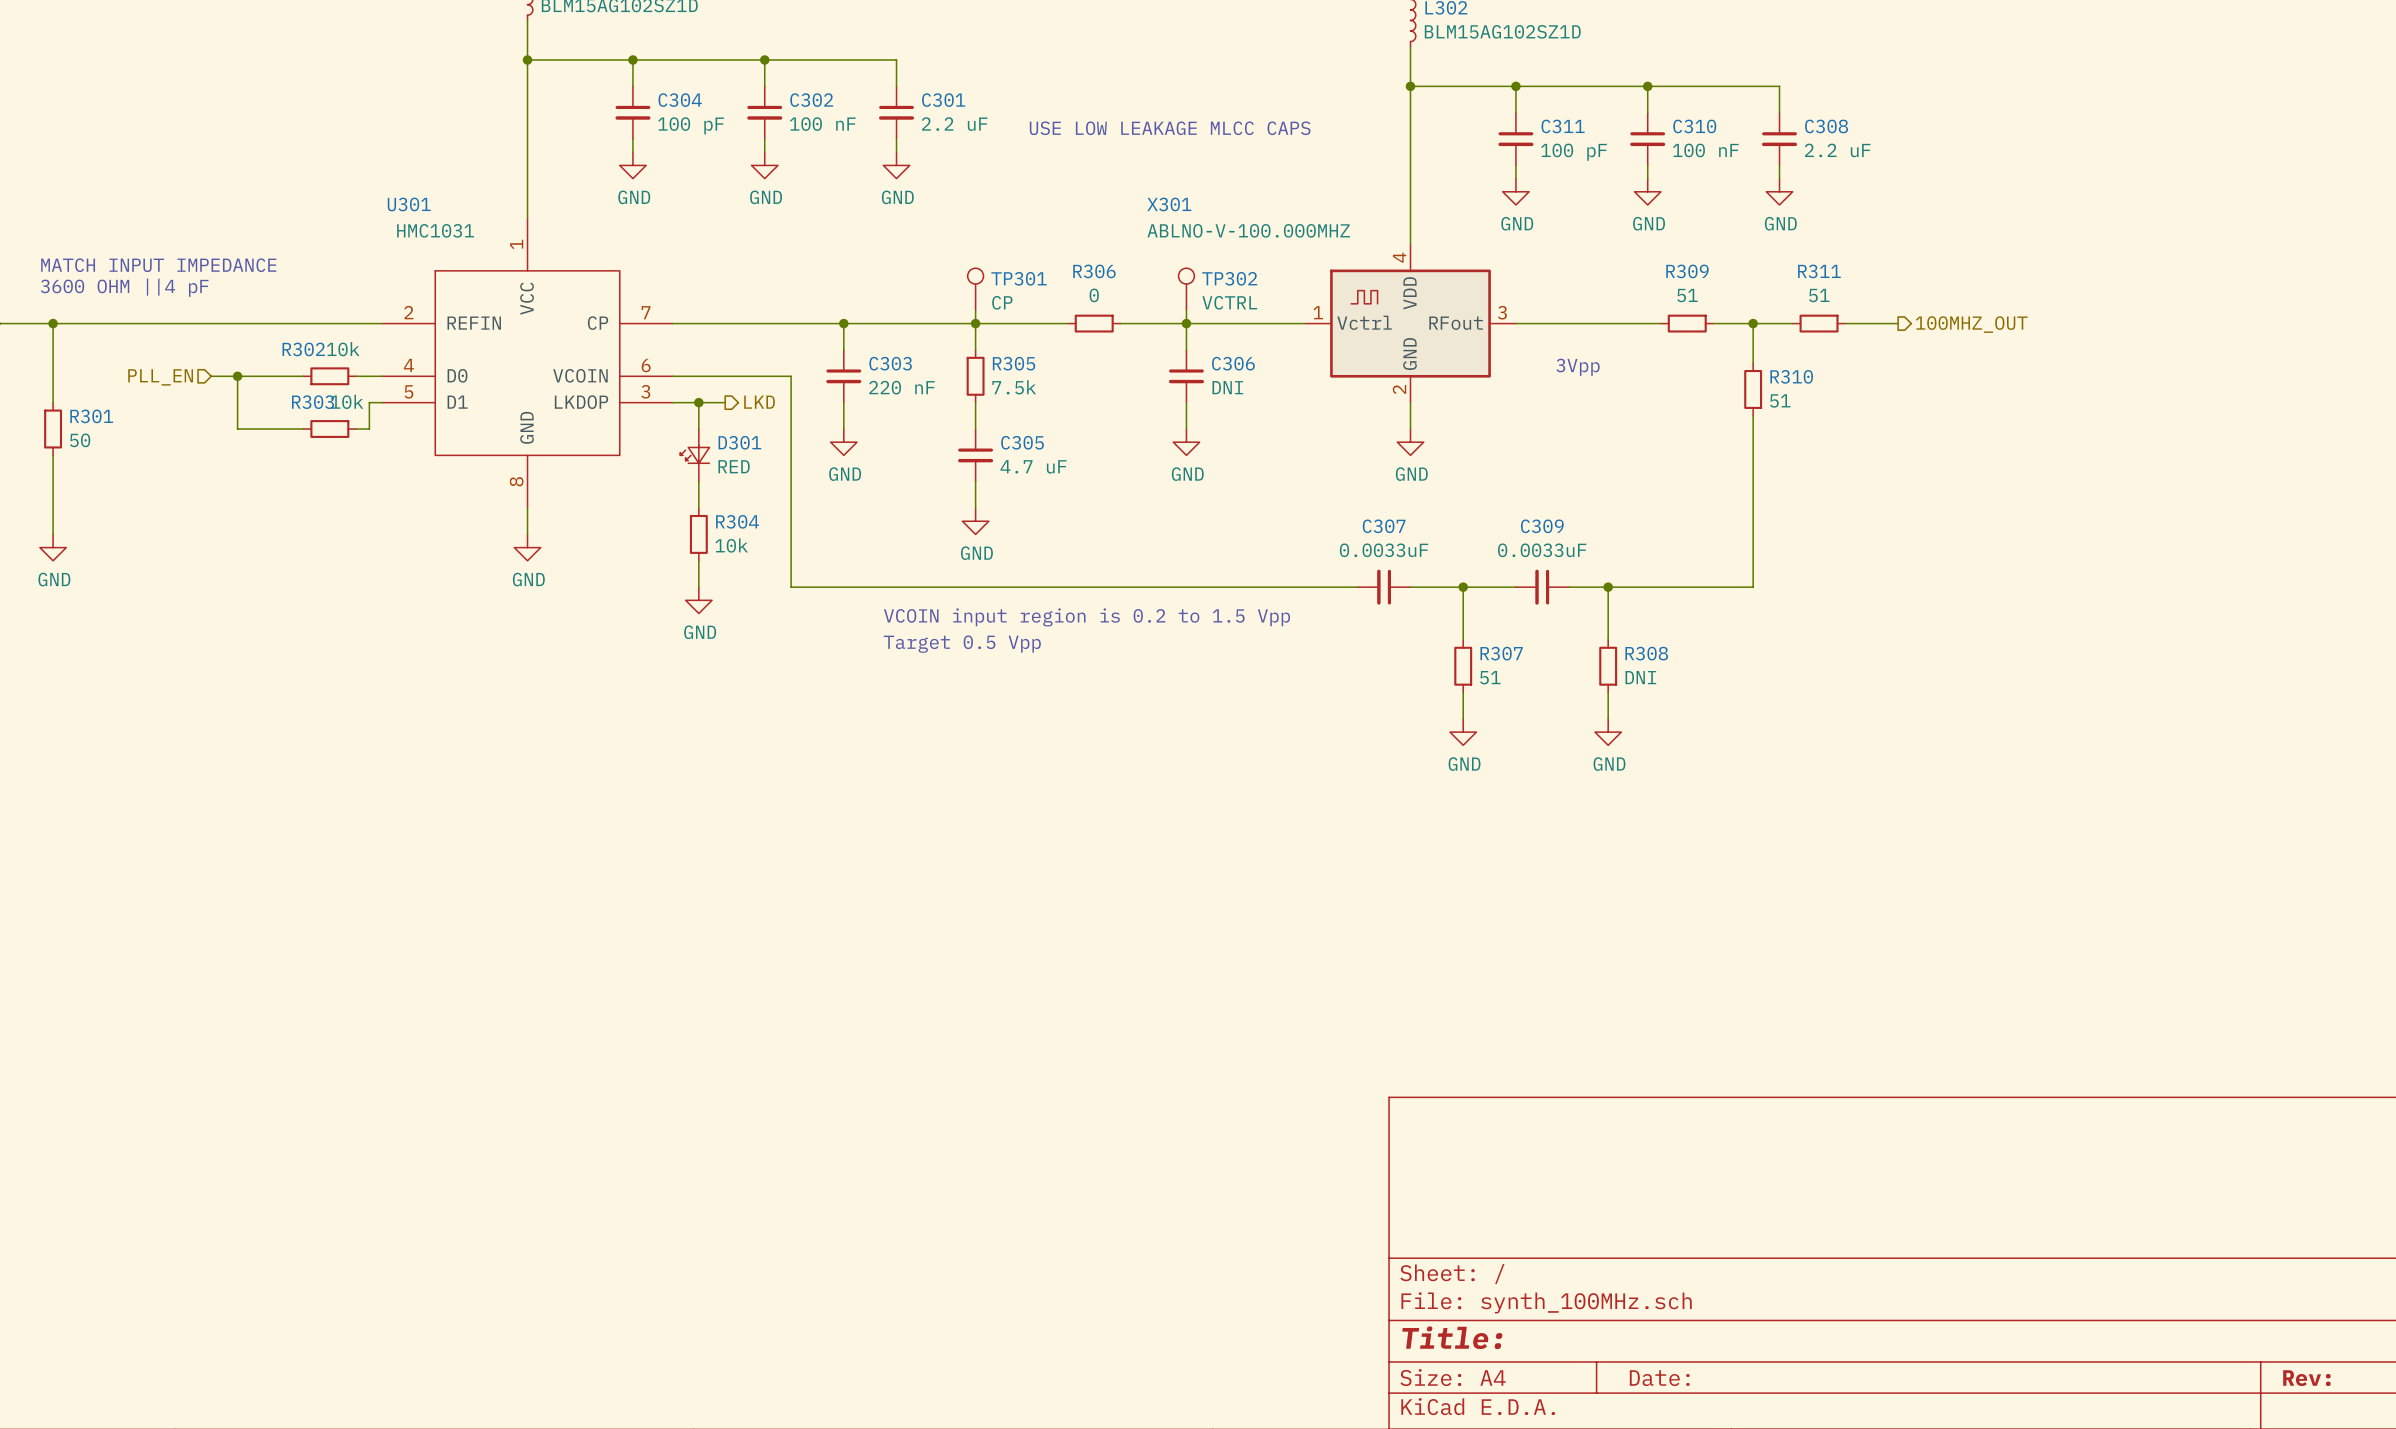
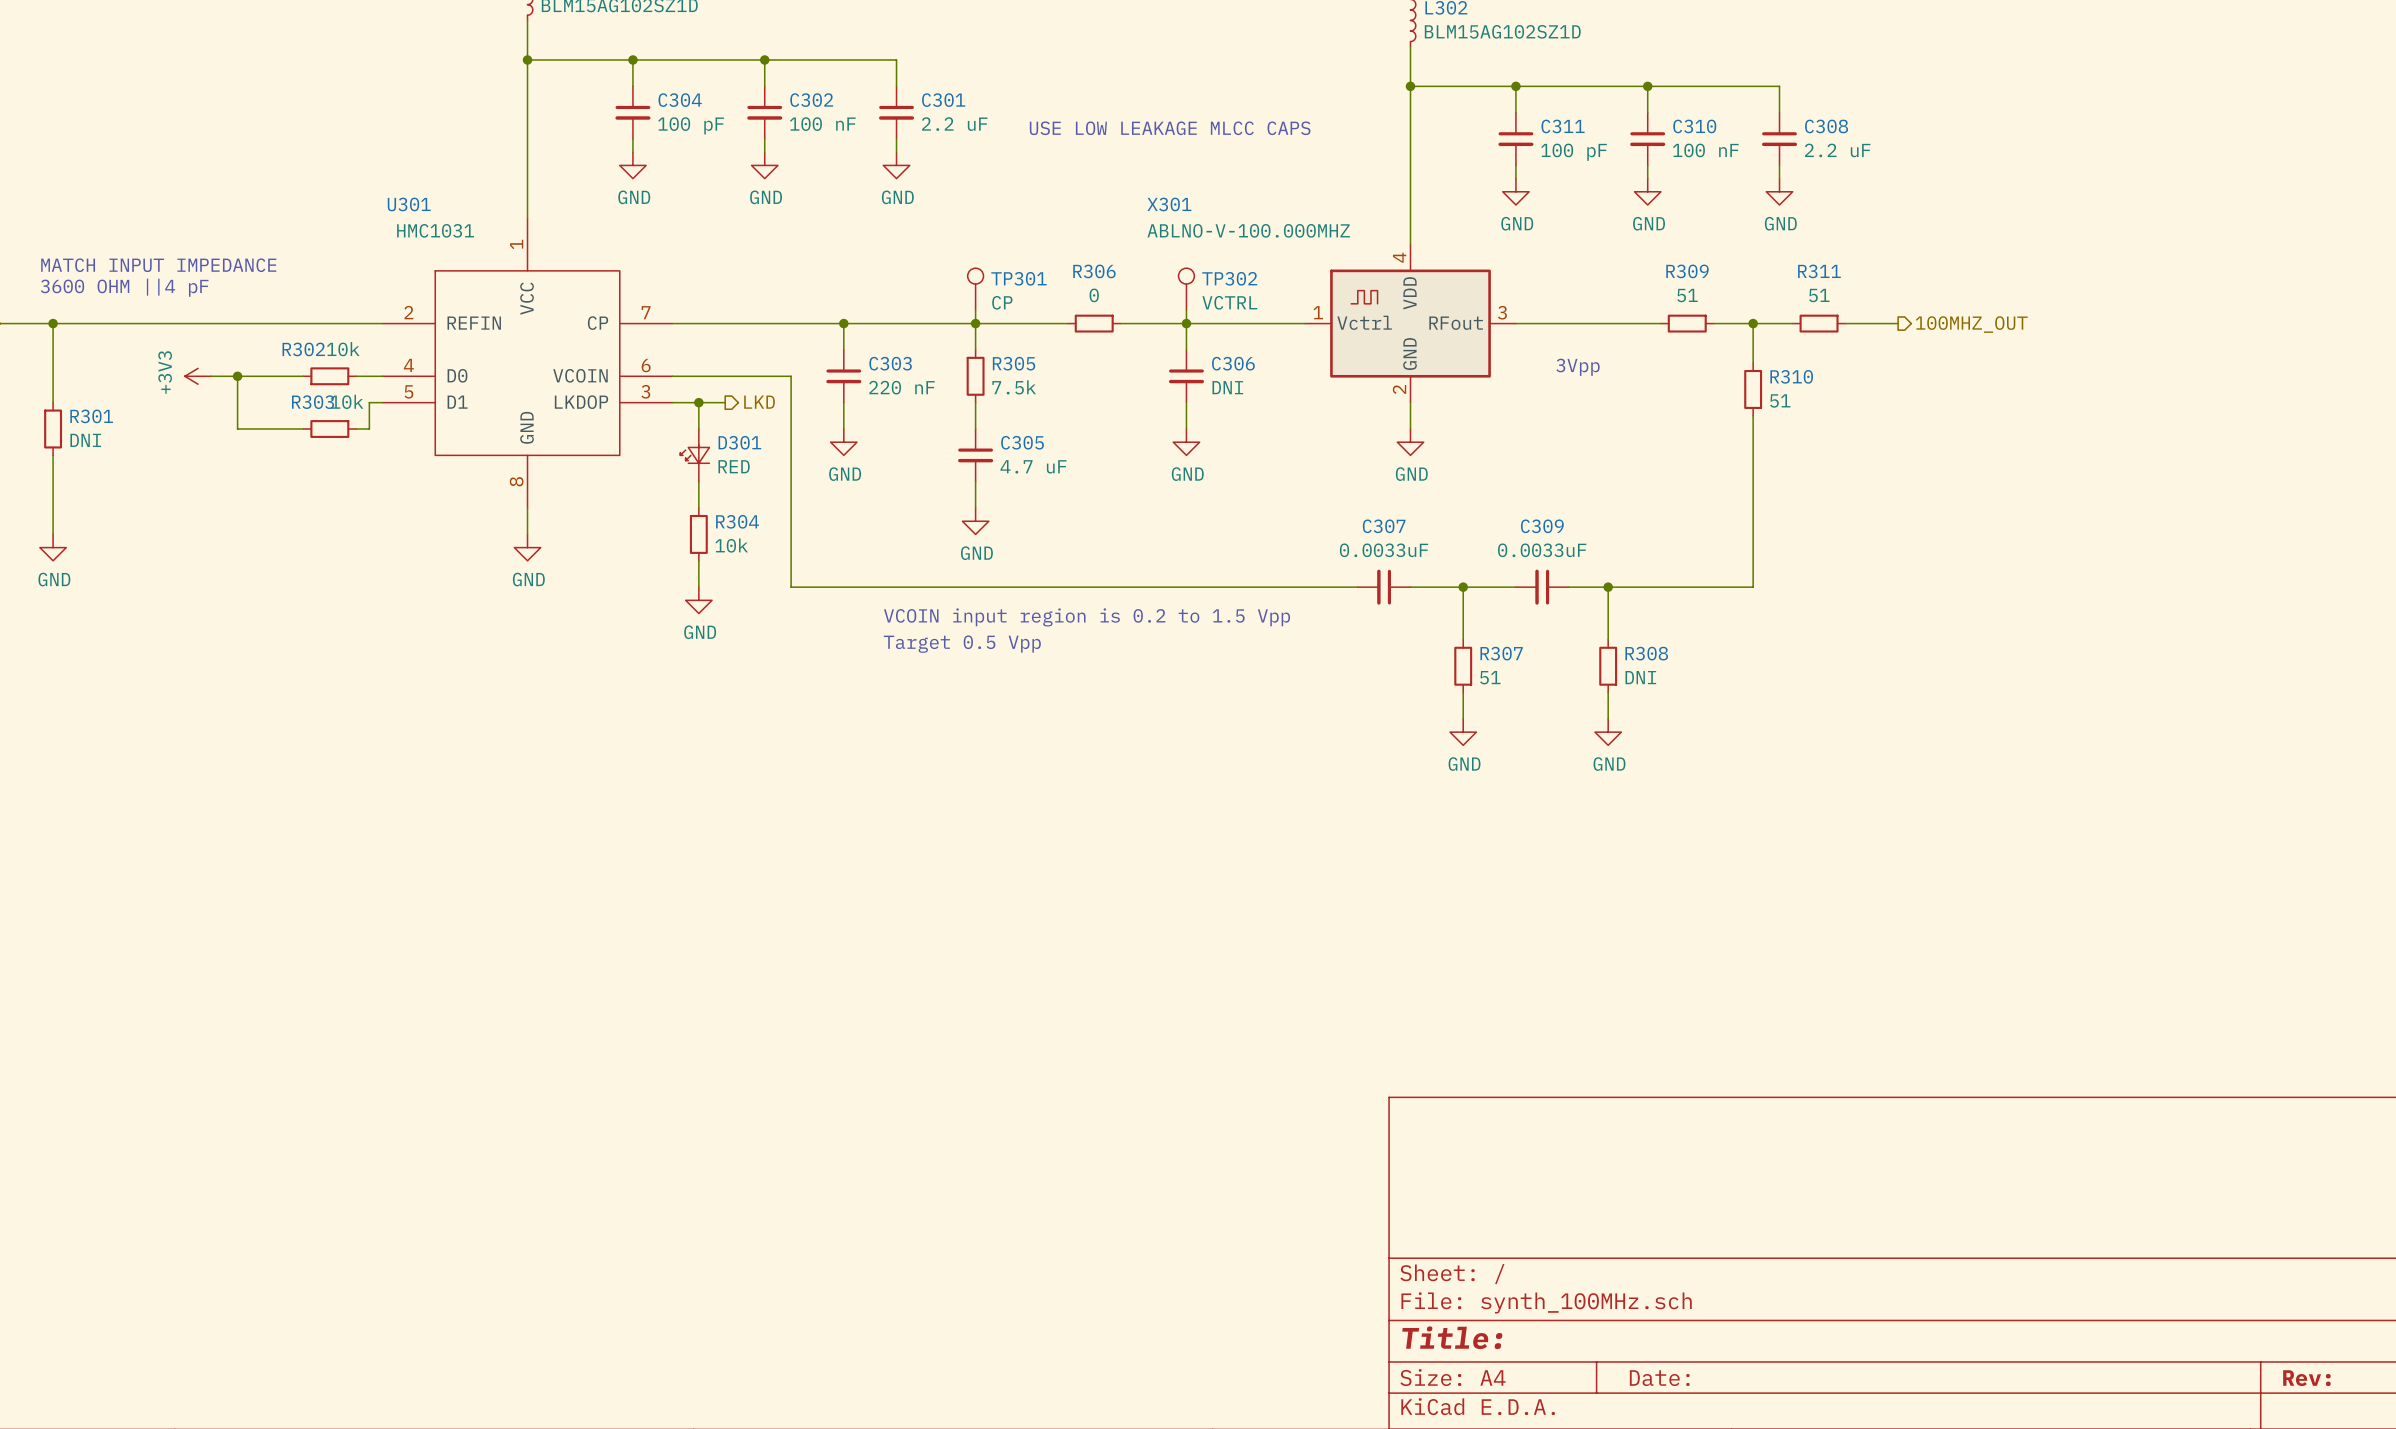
power symbol: none -> +3V3 (198, 376)
hierarchical label: PLL_EN (160, 377) -> none
R301 value: 50 (80, 440) -> DNI (85, 440)

